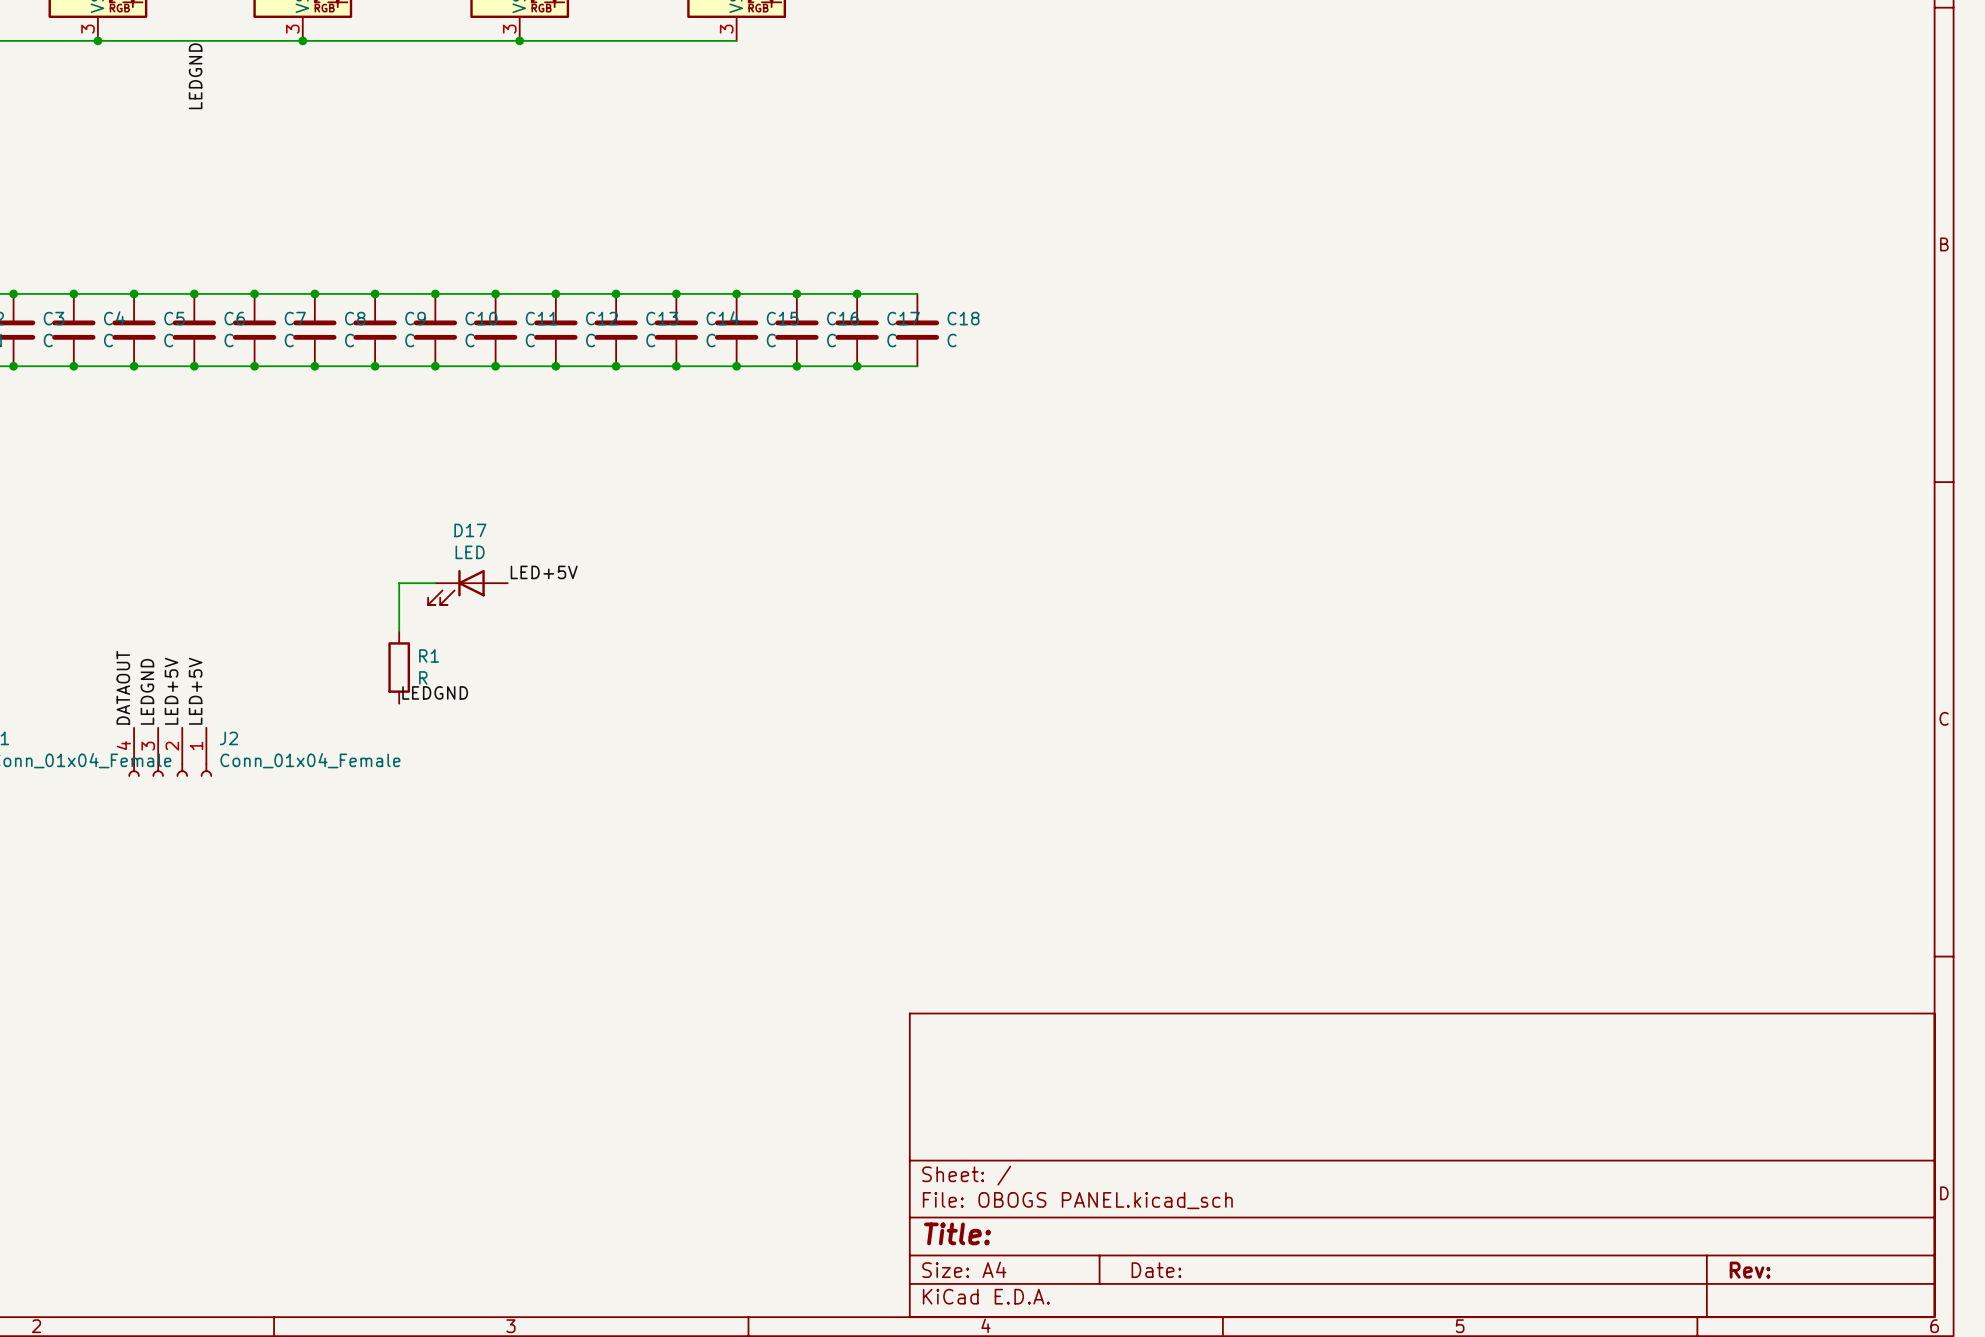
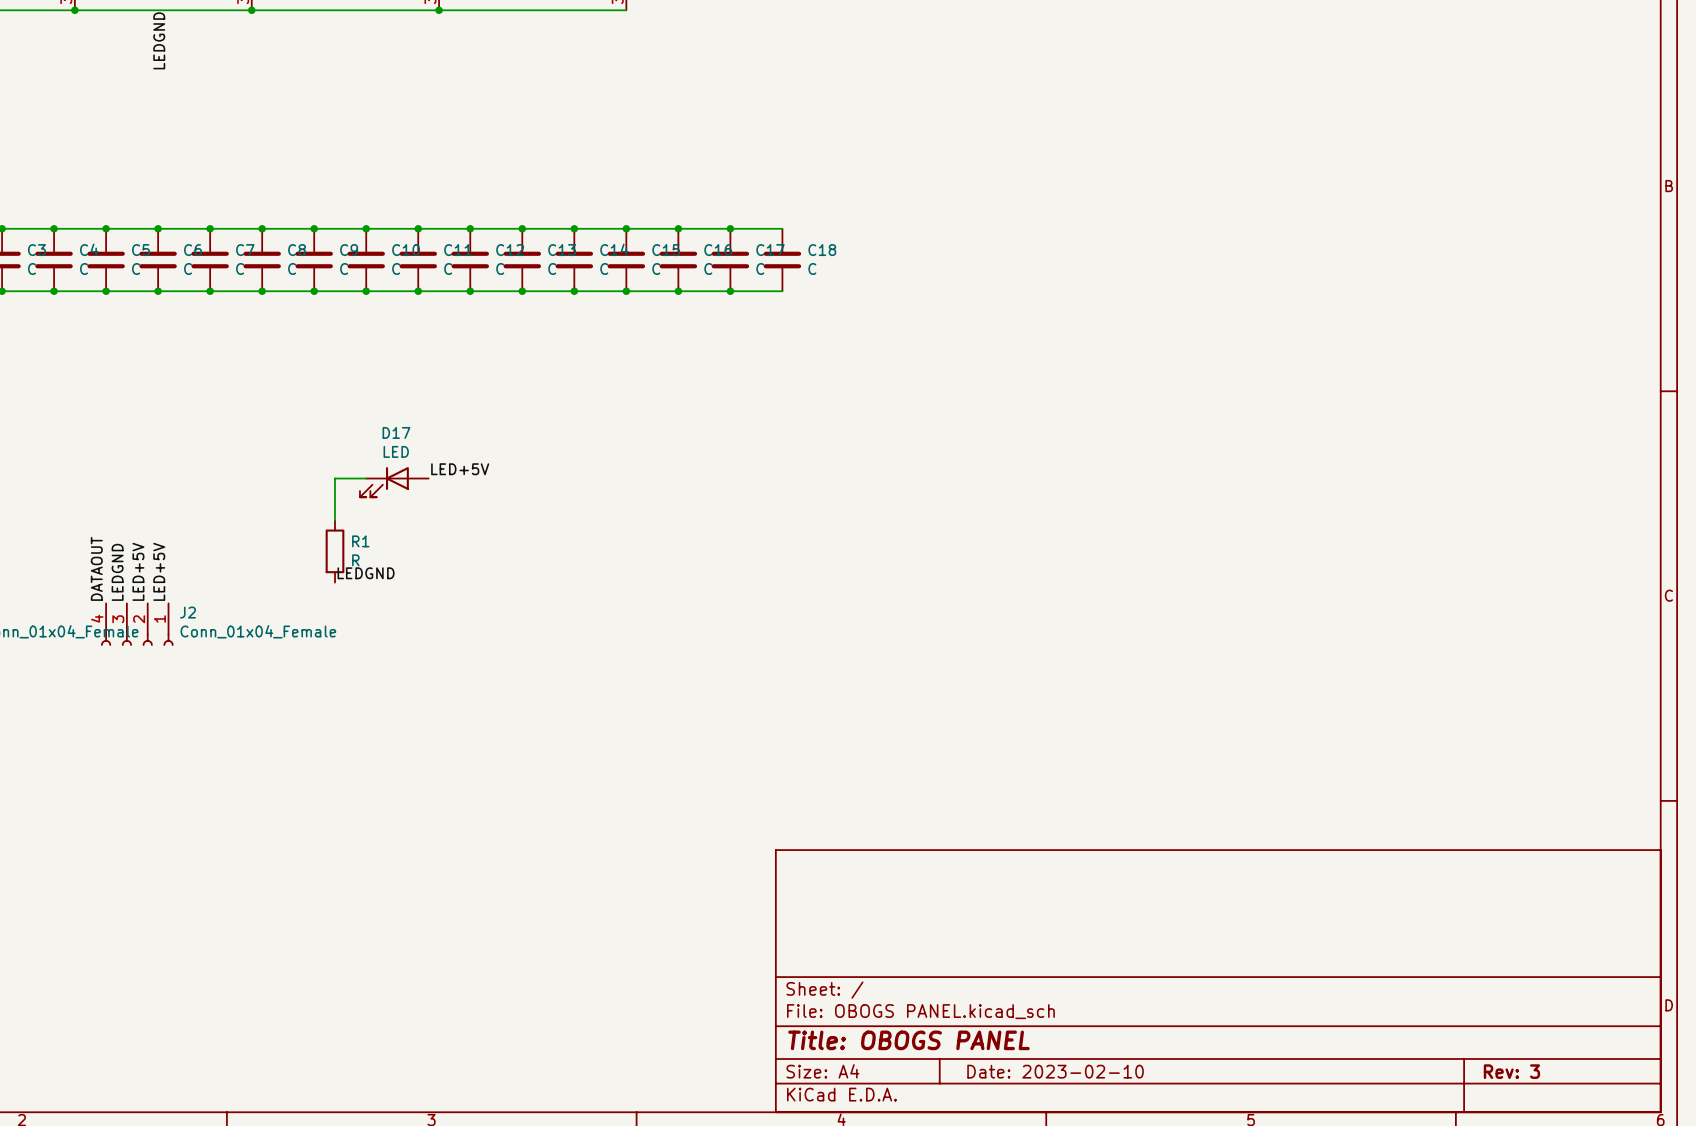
title block: Title: (957, 1233) -> Title: OBOGS PANEL (908, 1040)
title block: Date: (1156, 1270) -> Date: 2023-02-10 (1055, 1071)
title block: Rev: (1750, 1270) -> Rev: 3 (1511, 1071)

